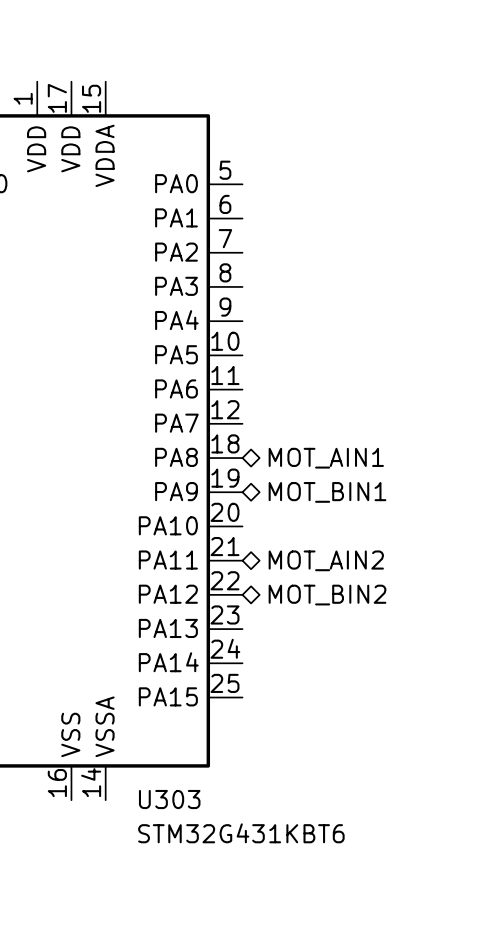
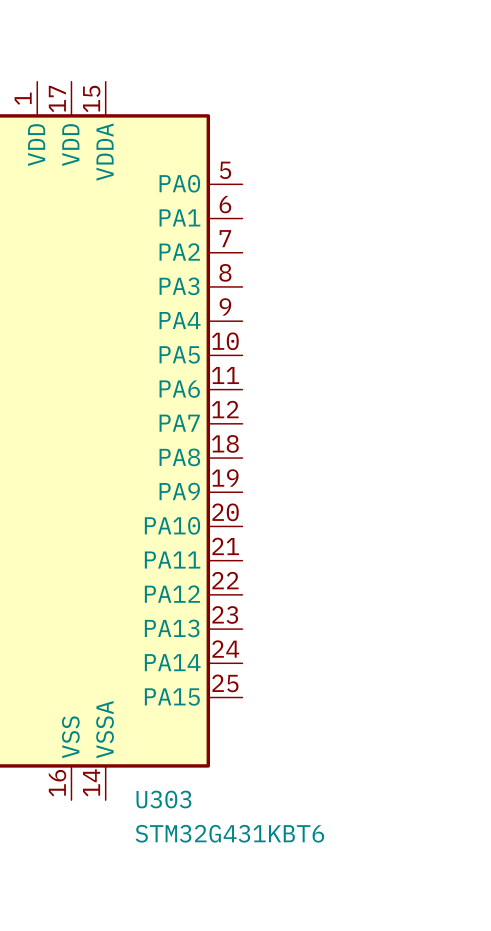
hierarchical label: MOT_AIN1 (326, 458) -> none
hierarchical label: MOT_BIN1 (327, 492) -> none
hierarchical label: MOT_AIN2 (326, 560) -> none
hierarchical label: MOT_BIN2 (327, 595) -> none

